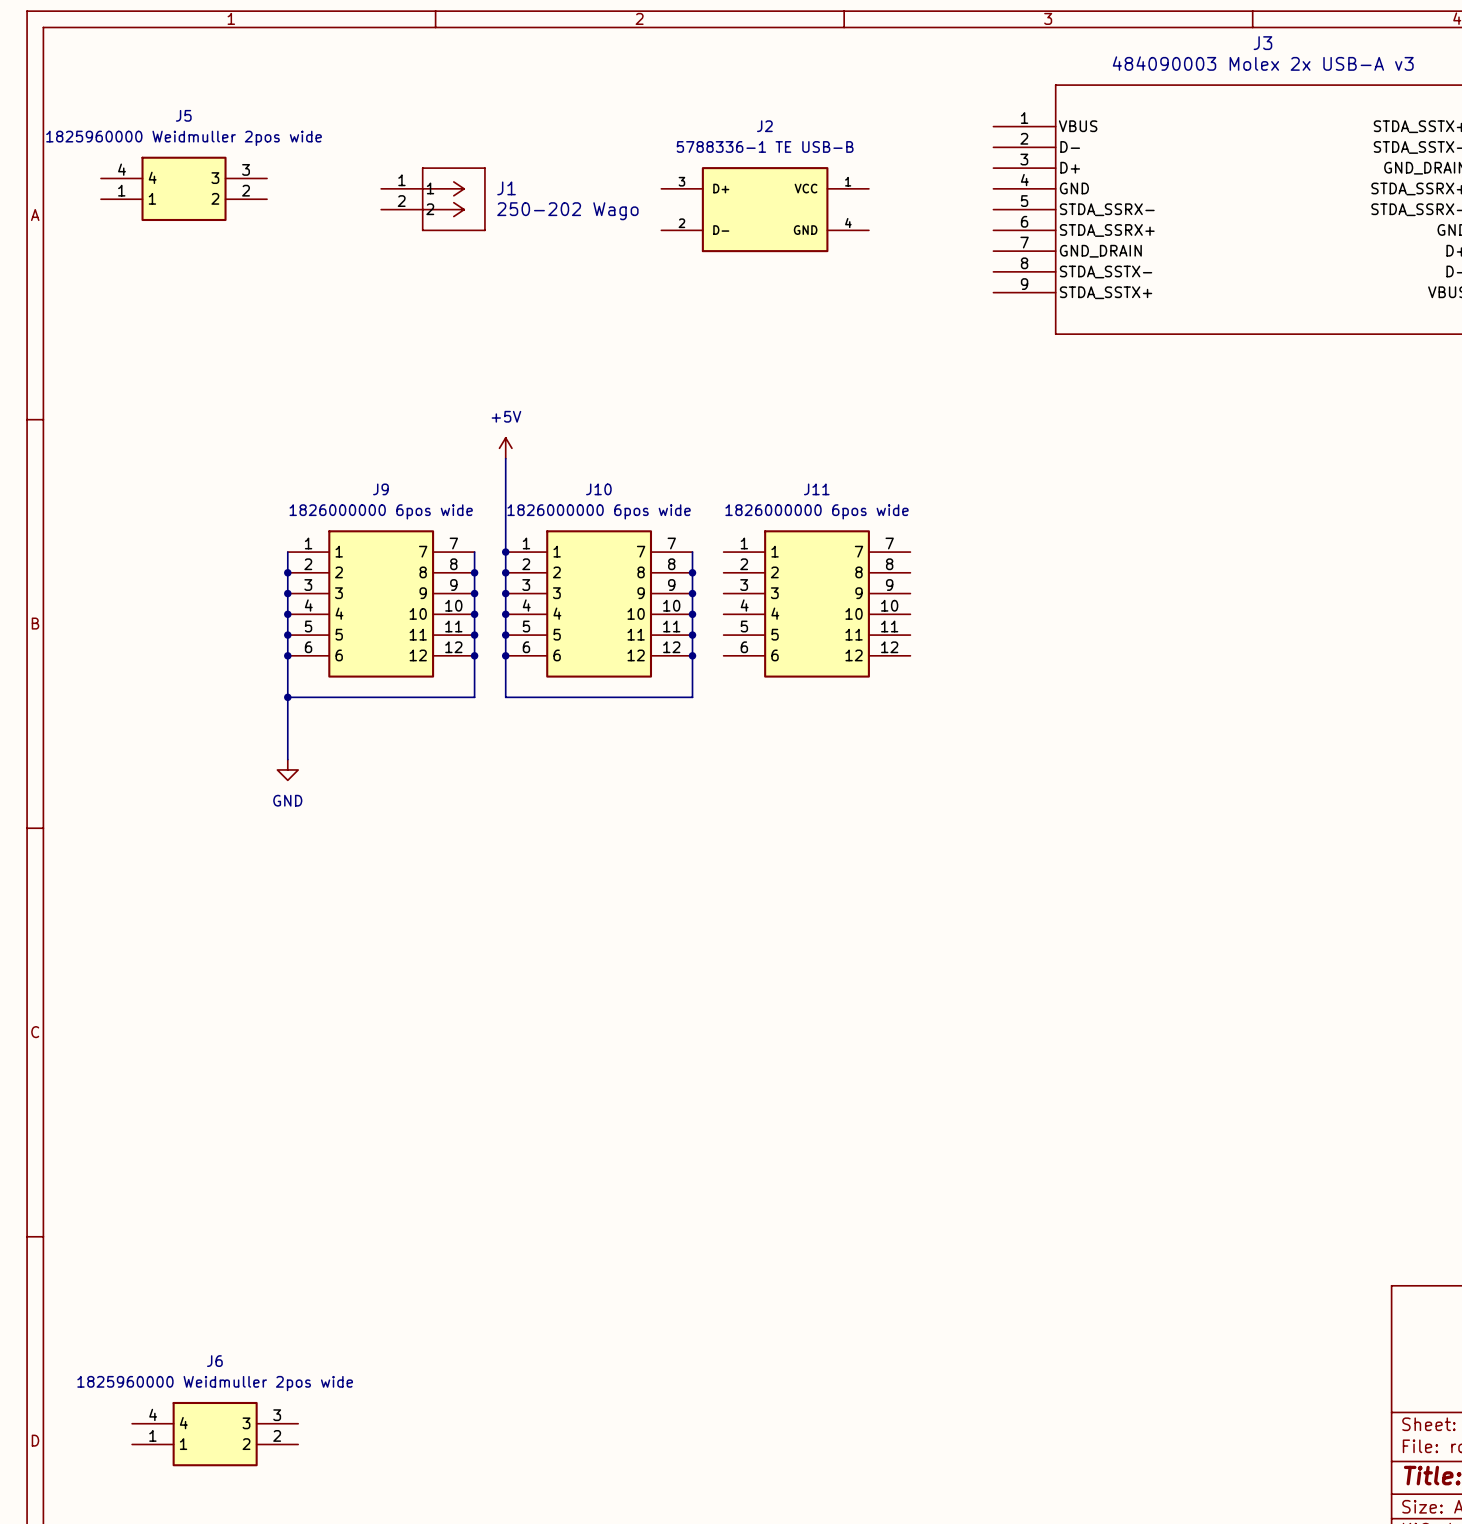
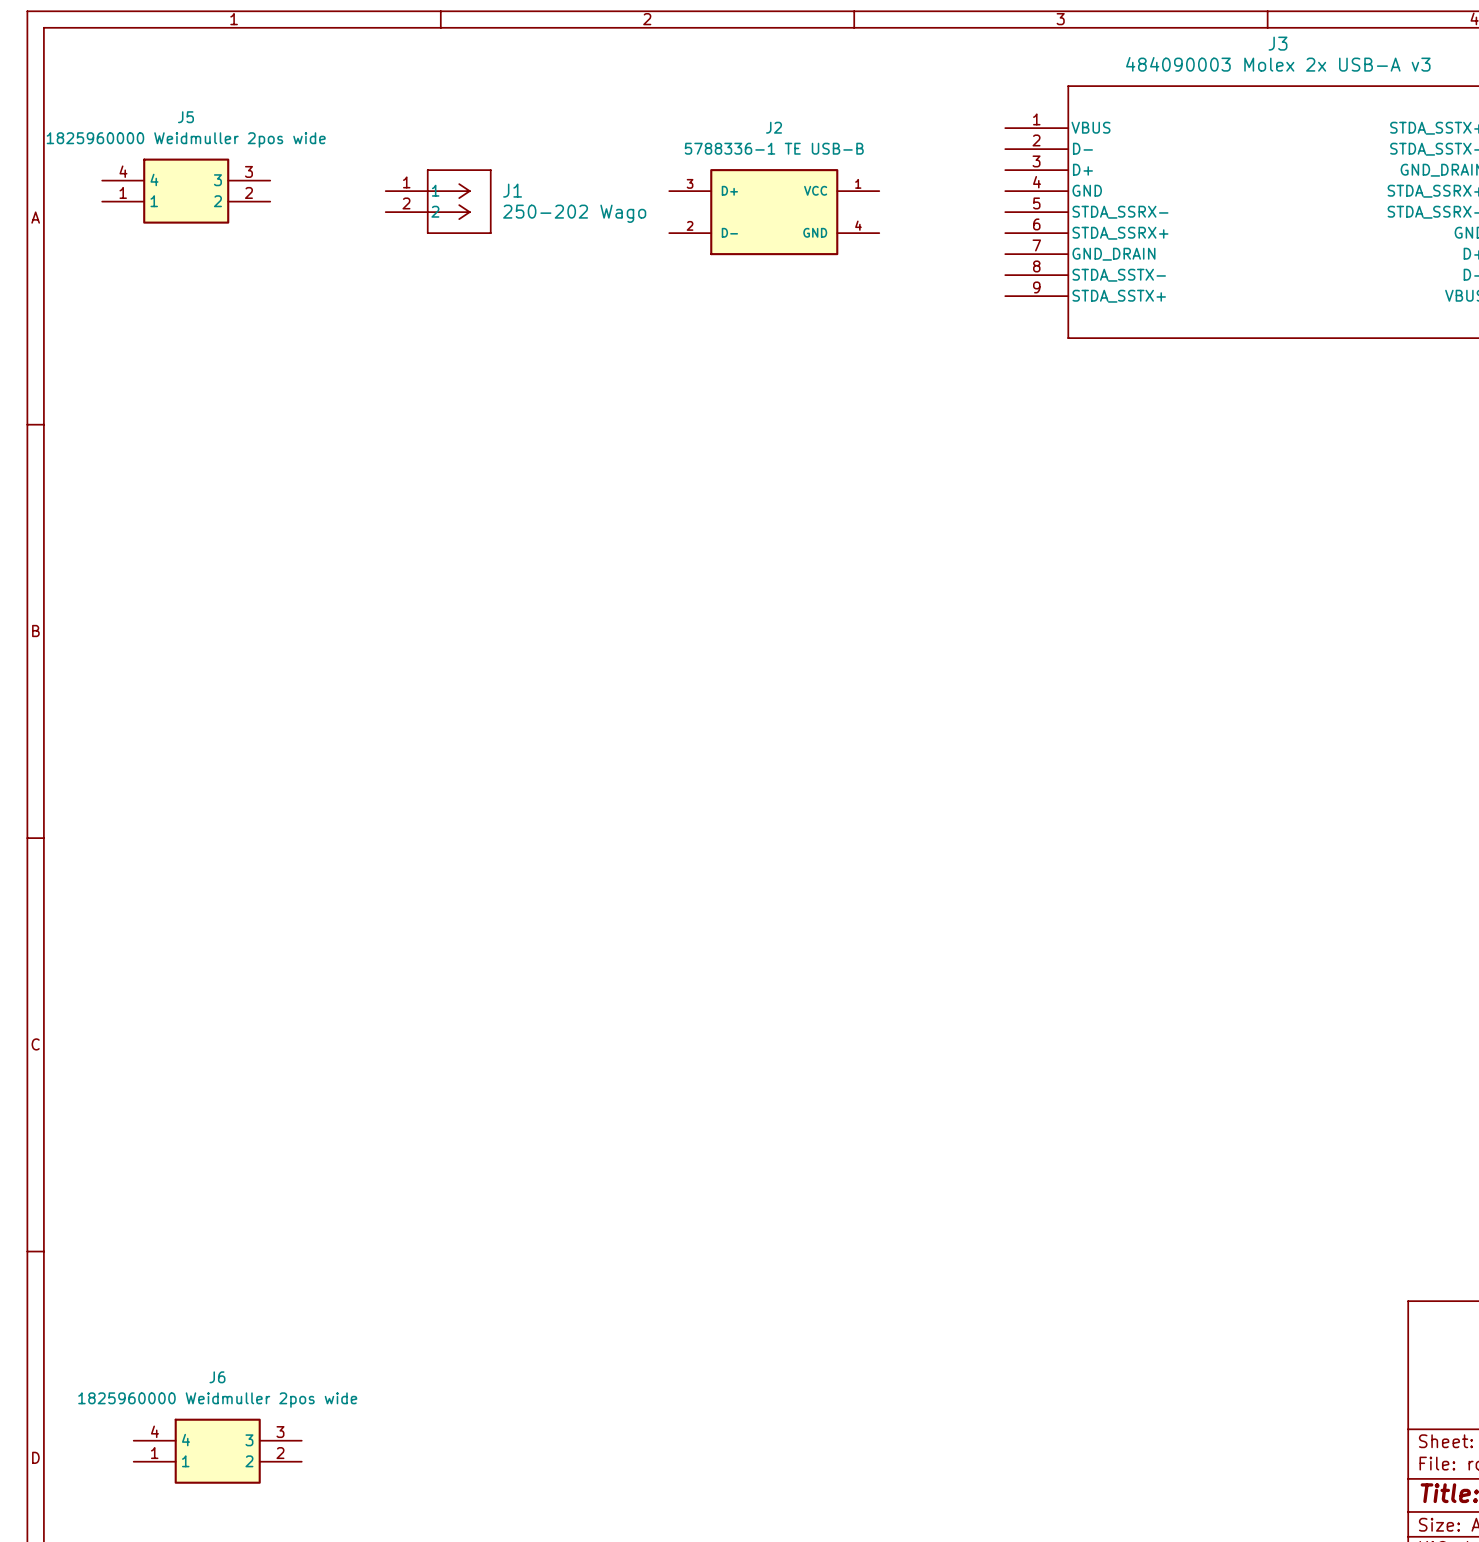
power symbol: +5V (505, 448) -> none
wire: (505, 458) (505, 697) (692, 697) (692, 552) -> none
wire: (287, 552) (287, 759) -> none
wire: (474, 552) (474, 697) (287, 697) -> none
junction: (505, 552) -> none
junction: (287, 572) -> none
junction: (474, 572) -> none
junction: (505, 572) -> none
junction: (692, 572) -> none
junction: (287, 593) -> none
junction: (474, 593) -> none
junction: (505, 593) -> none
junction: (692, 593) -> none
J9: 1826000000 6pos wide (381, 603) -> none
J10: 1826000000 6pos wide (599, 603) -> none
J11: 1826000000 6pos wide (817, 603) -> none
junction: (287, 614) -> none
junction: (474, 614) -> none
junction: (505, 614) -> none
junction: (692, 614) -> none
junction: (287, 635) -> none
junction: (474, 635) -> none
junction: (505, 635) -> none
junction: (692, 635) -> none
junction: (287, 655) -> none
junction: (474, 655) -> none
junction: (505, 655) -> none
junction: (692, 655) -> none
junction: (287, 697) -> none
power symbol: GND (287, 769) -> none

